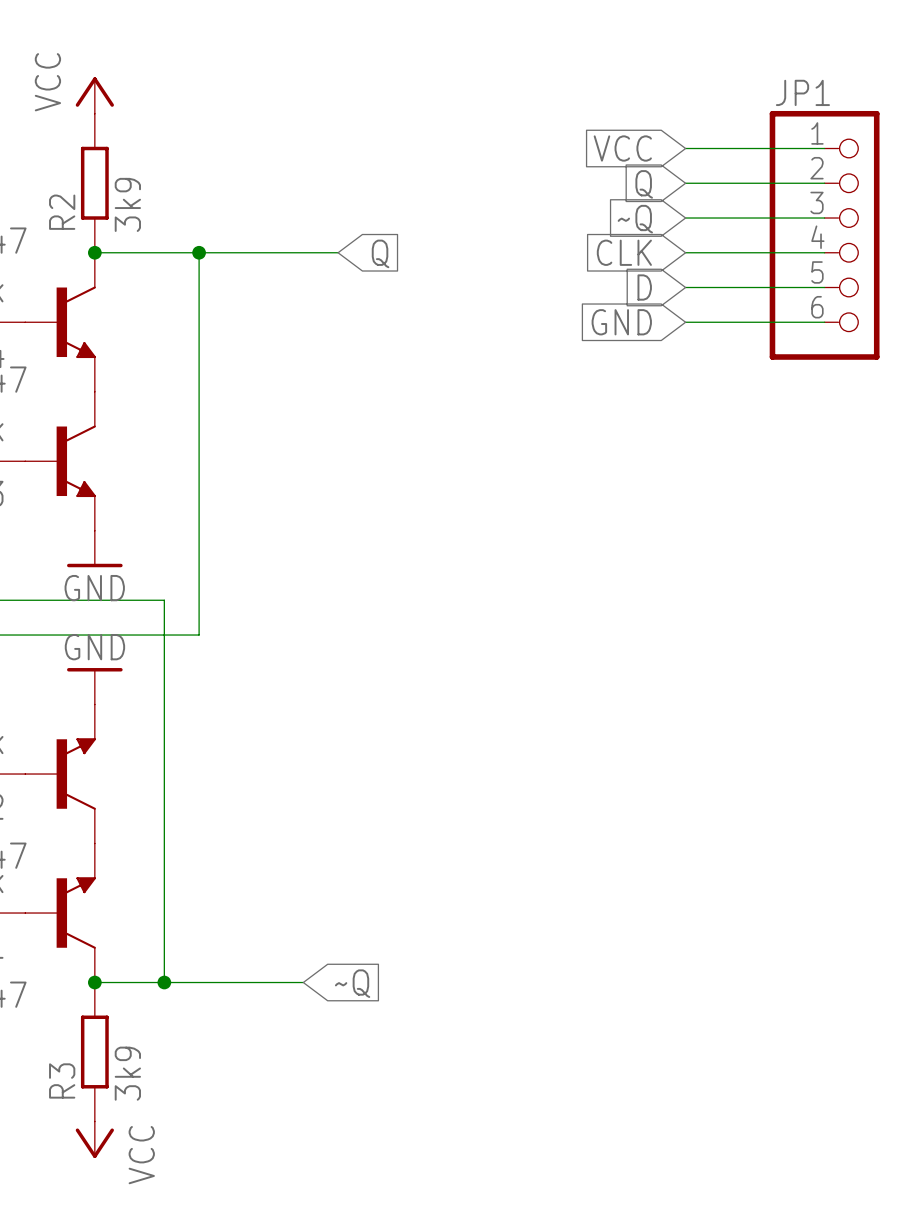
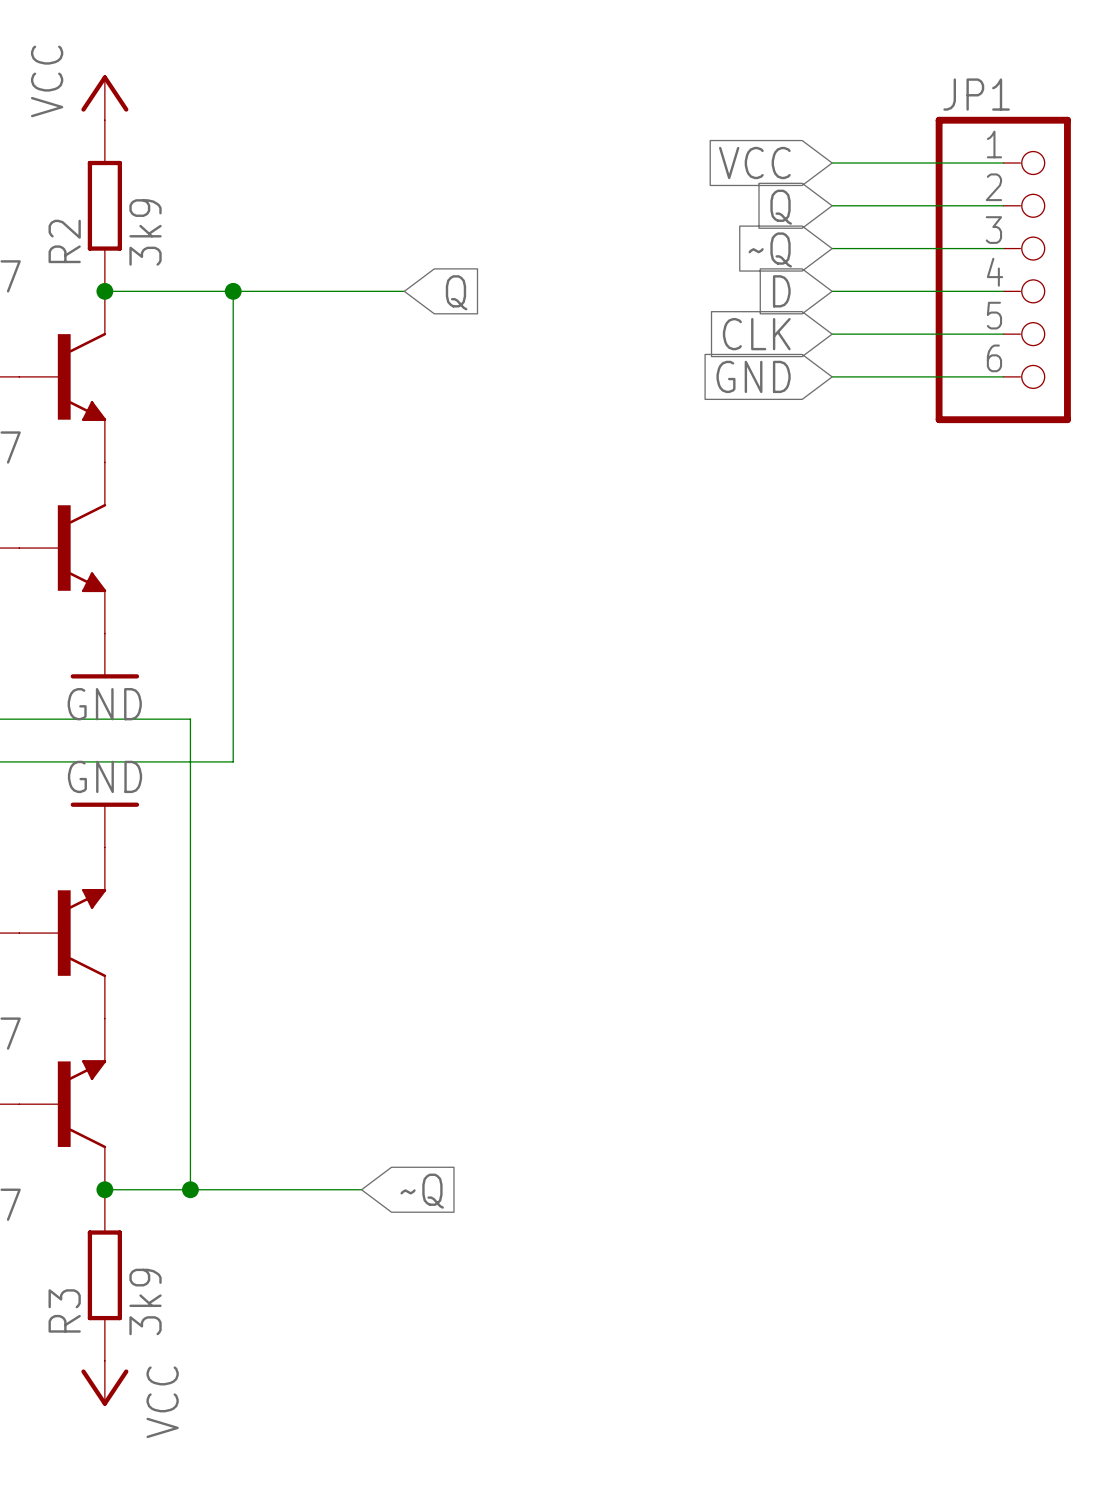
global label: CLK (624, 252) -> D (781, 291)
global label: D (644, 287) -> CLK (756, 334)

